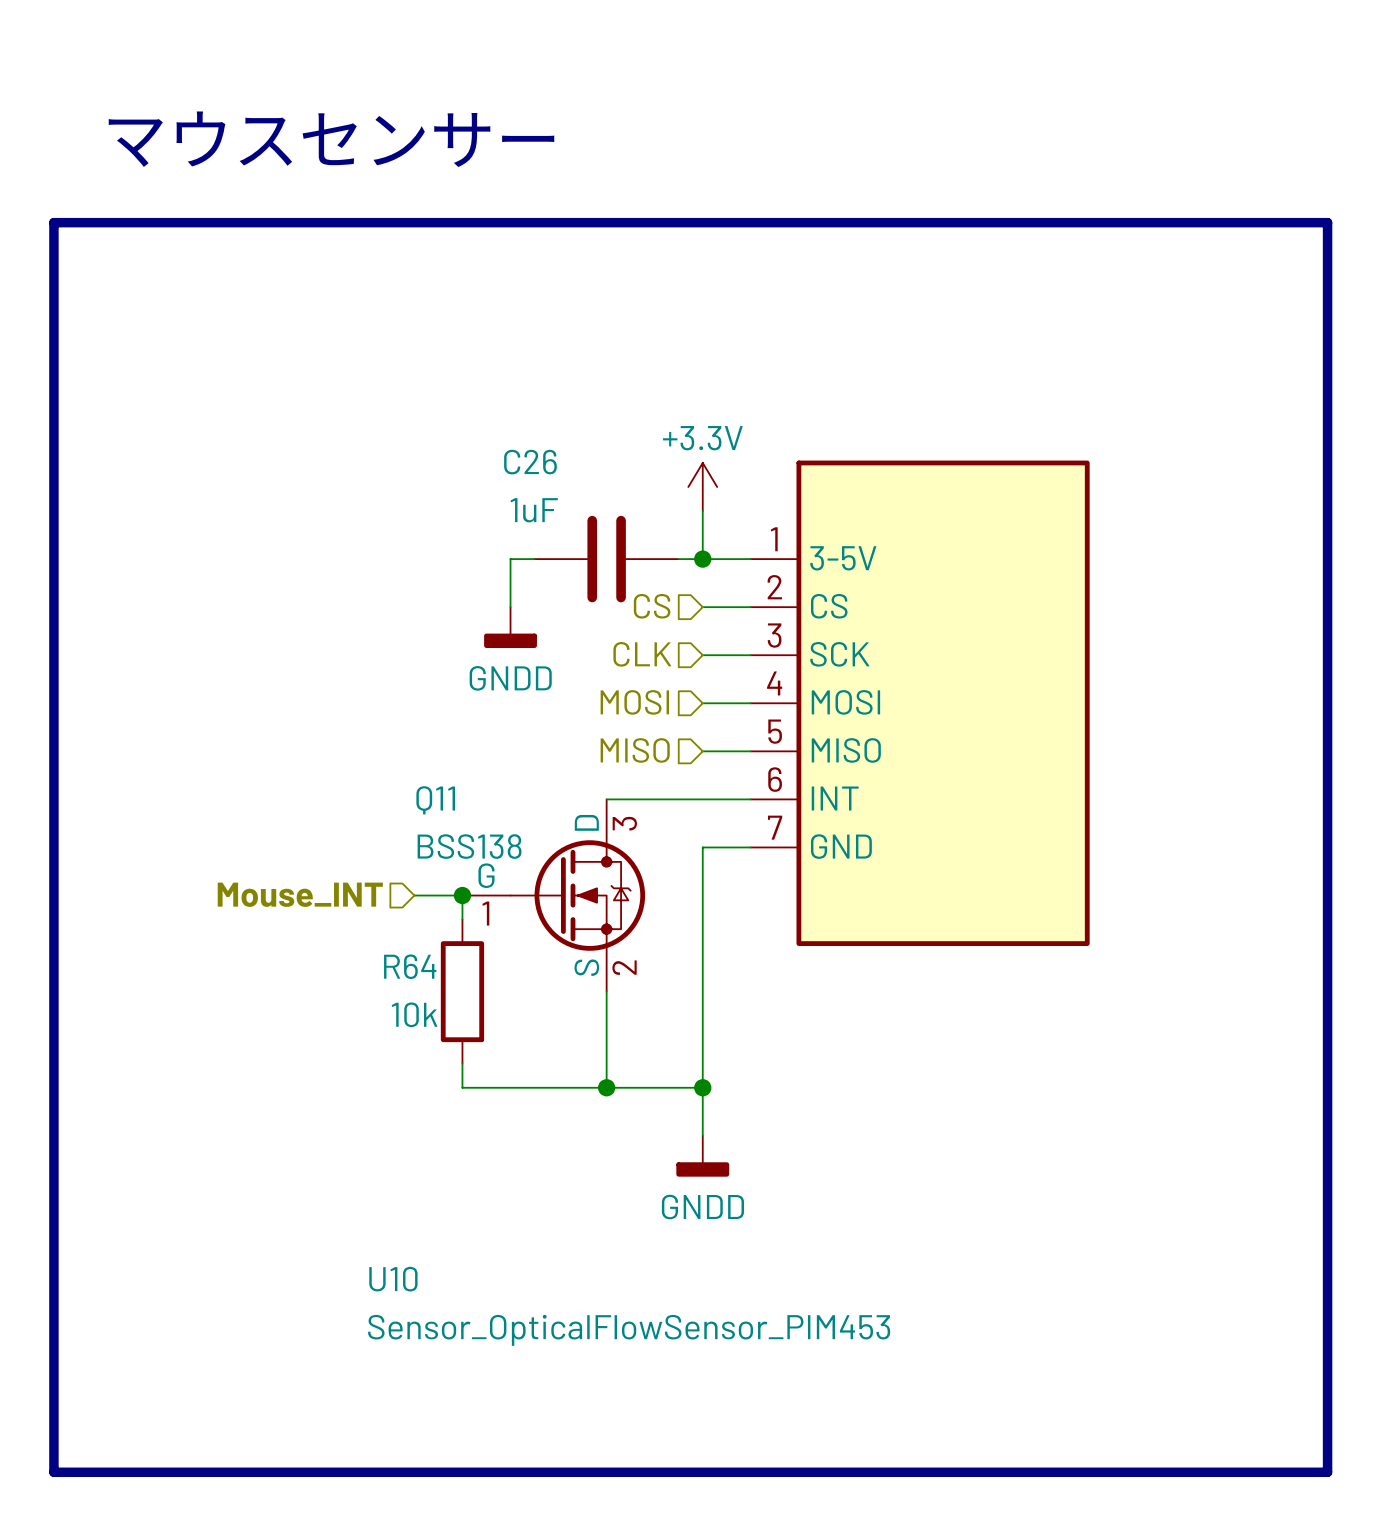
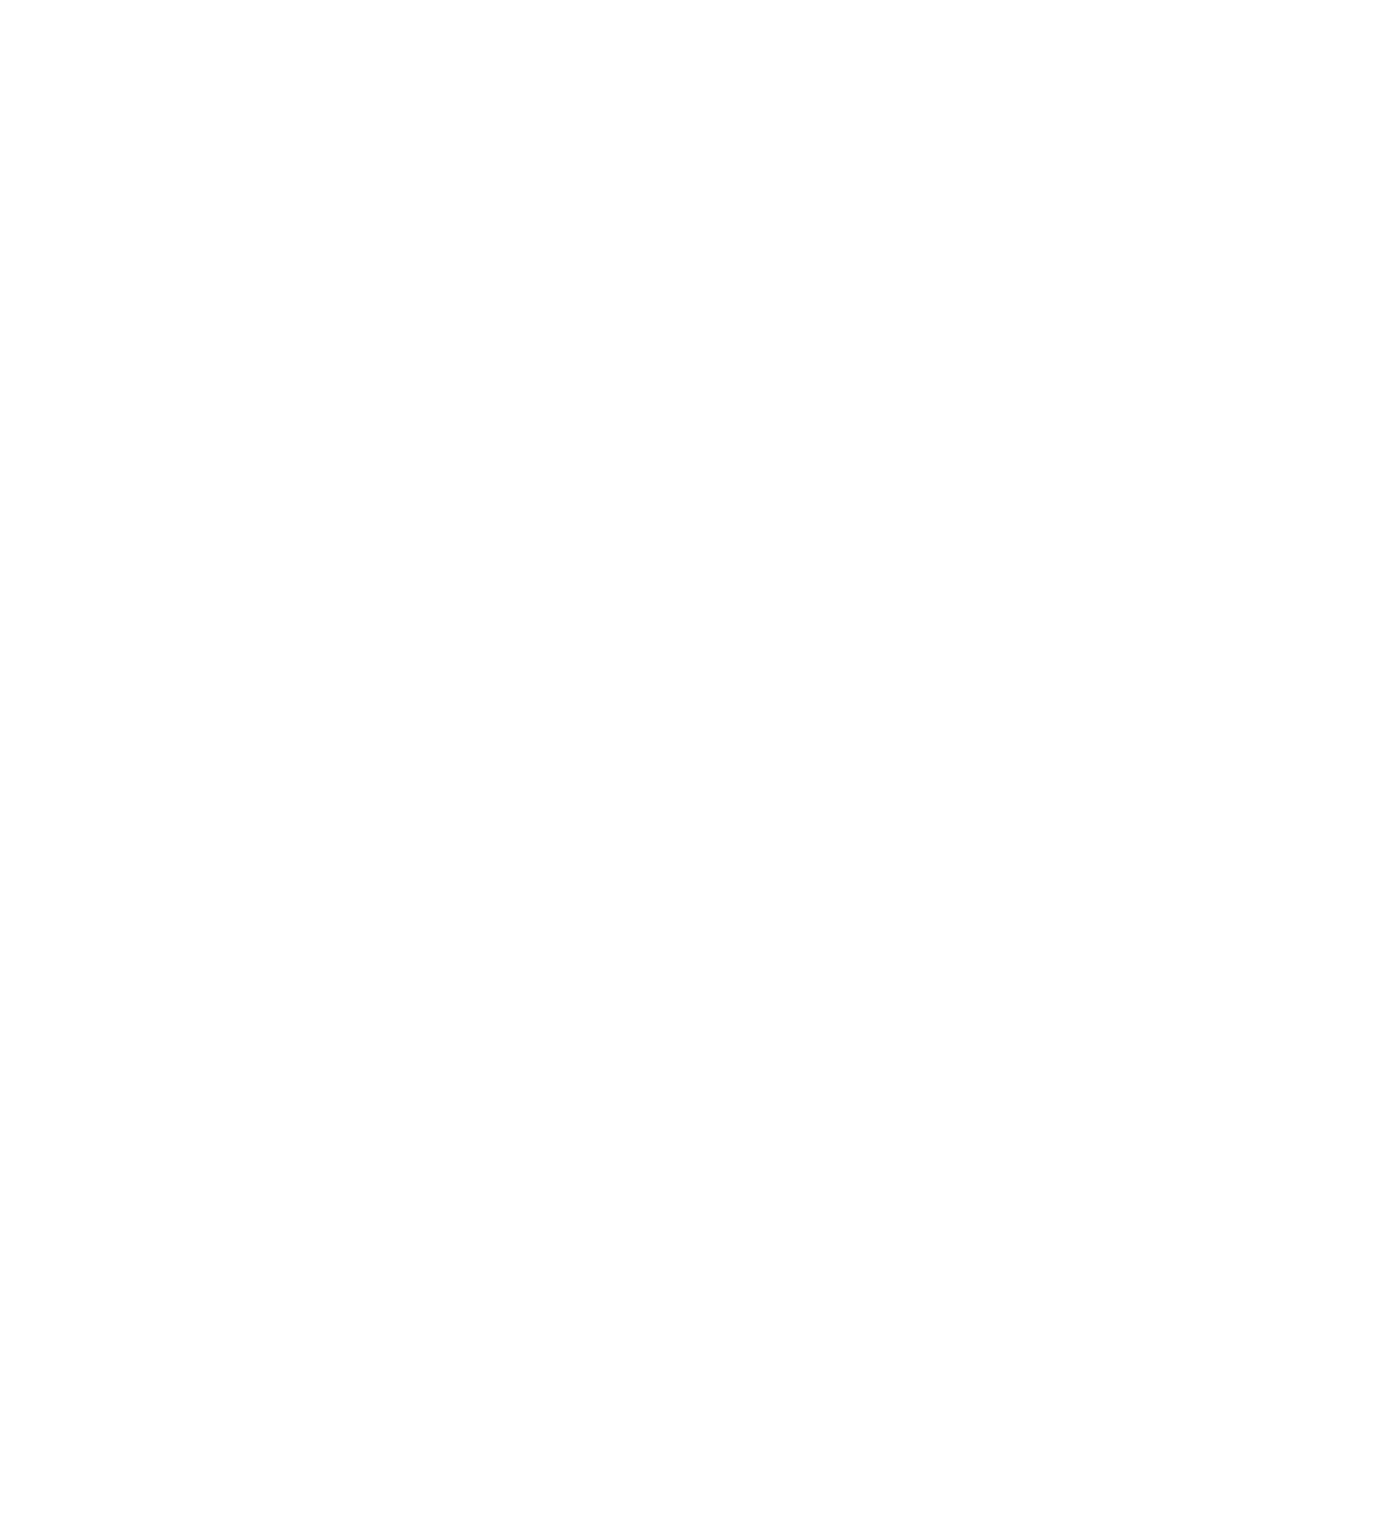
text: マウスセンサー (331, 139) -> none
line: (53, 222) (1327, 222) (1327, 1472) (53, 1472) (53, 222) -> none
power symbol: +3.3V (702, 487) -> none
wire: (702, 511) (702, 559) -> none
wire: (534, 559) (510, 559) (510, 607) -> none
C26: 1uF (606, 559) -> none
wire: (678, 559) (750, 559) -> none
junction: (702, 559) -> none
hierarchical label: CS (652, 606) -> none
wire: (702, 607) (750, 607) -> none
power symbol: GNDD (510, 627) -> none
hierarchical label: CLK (642, 654) -> none
wire: (702, 655) (750, 655) -> none
hierarchical label: MOSI (634, 702) -> none
wire: (702, 703) (750, 703) -> none
U10: Sensor_OpticalFlowSensor_PIM453 (920, 703) -> none
hierarchical label: MISO (635, 750) -> none
wire: (702, 751) (750, 751) -> none
wire: (606, 799) (750, 799) -> none
wire: (750, 847) (702, 847) (702, 1135) -> none
hierarchical label: Mouse_INT (300, 894) -> none
wire: (414, 895) (462, 895) (462, 919) -> none
junction: (462, 895) -> none
Q11: BSS138 (553, 895) -> none
R64: 10k (462, 991) -> none
wire: (606, 991) (606, 1087) -> none
wire: (462, 1063) (462, 1087) (702, 1087) -> none
junction: (606, 1087) -> none
junction: (702, 1087) -> none
power symbol: GNDD (702, 1156) -> none

